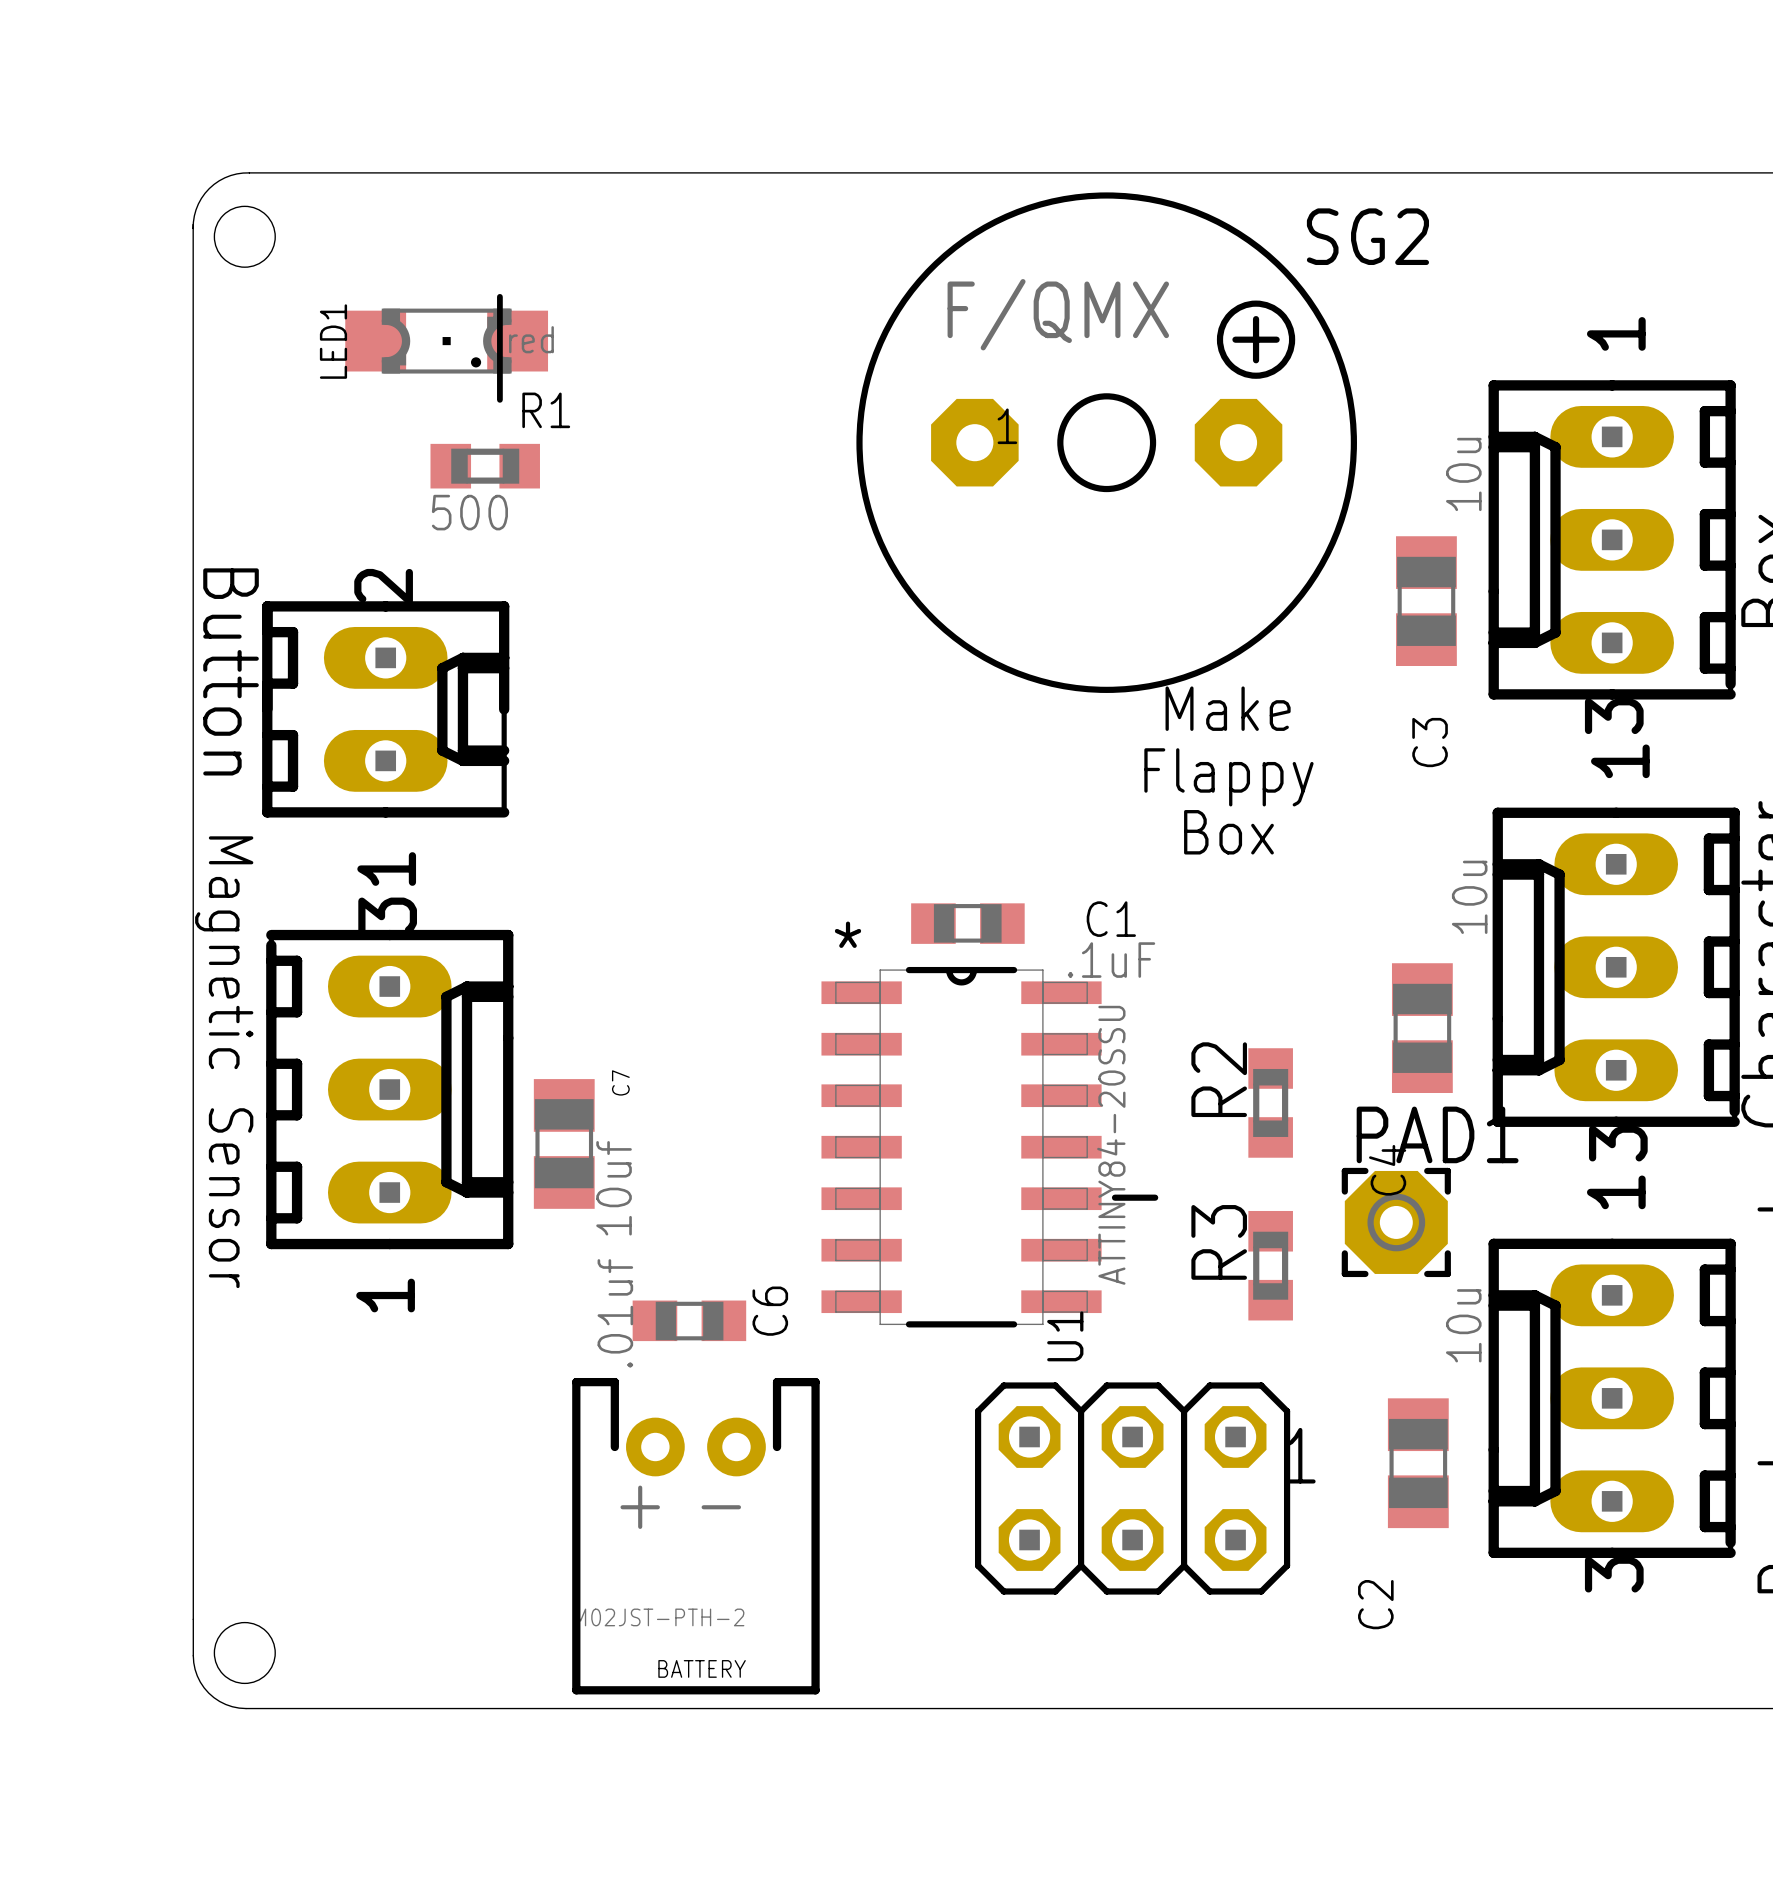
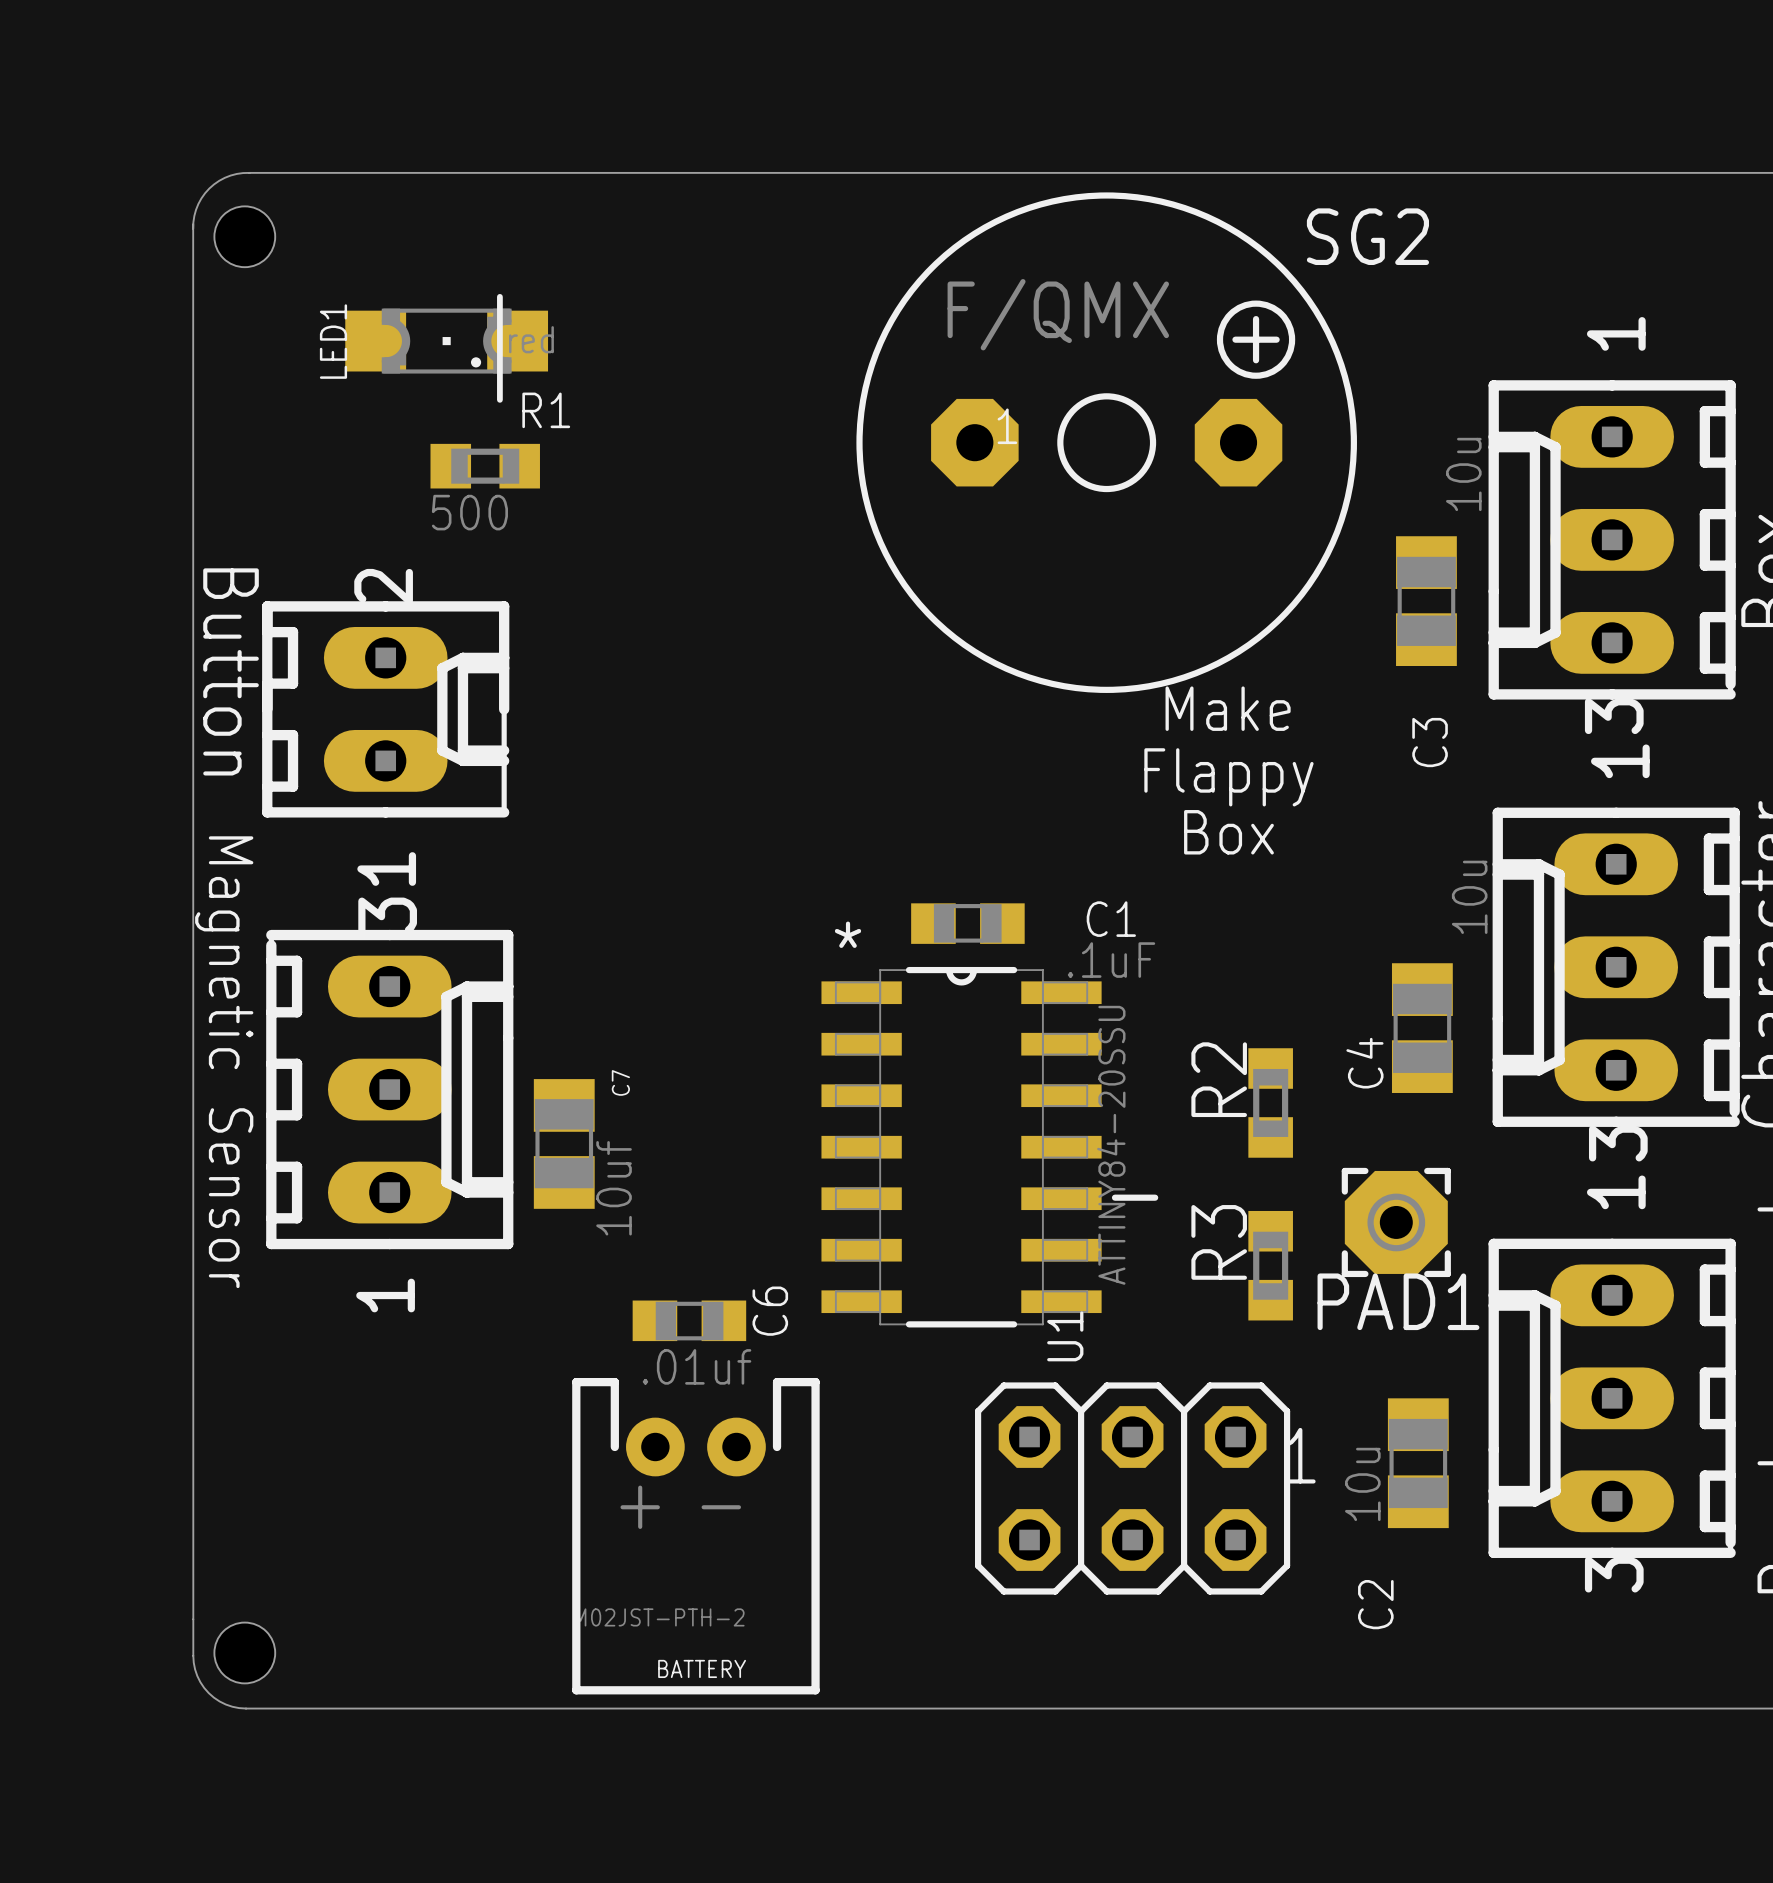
PAD1 name position: PAD1 (1437, 1134) -> PAD1 (1398, 1301)
C4 name position: C4 (1387, 1170) -> C4 (1364, 1063)
C6 value rotation: 0° (615, 1313) -> 90° clockwise (697, 1366)
C2 value position: 10u (1463, 1325) -> 10u (1362, 1484)

